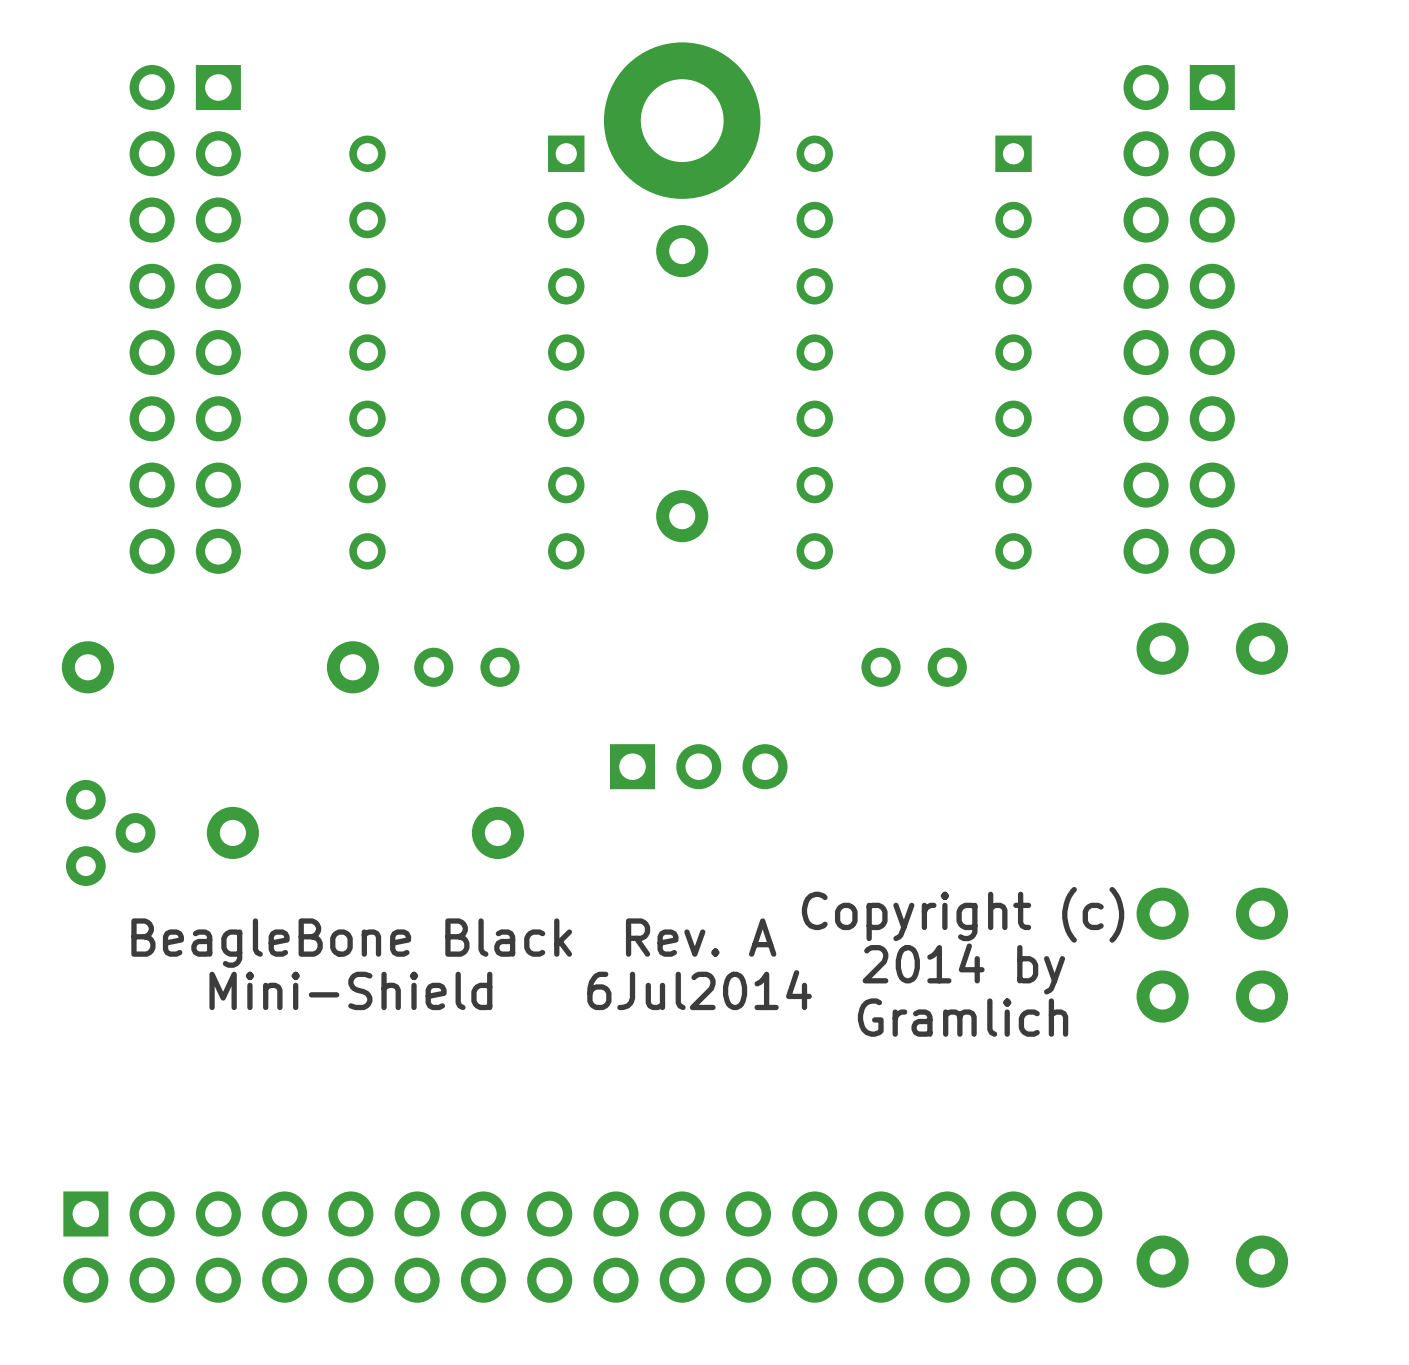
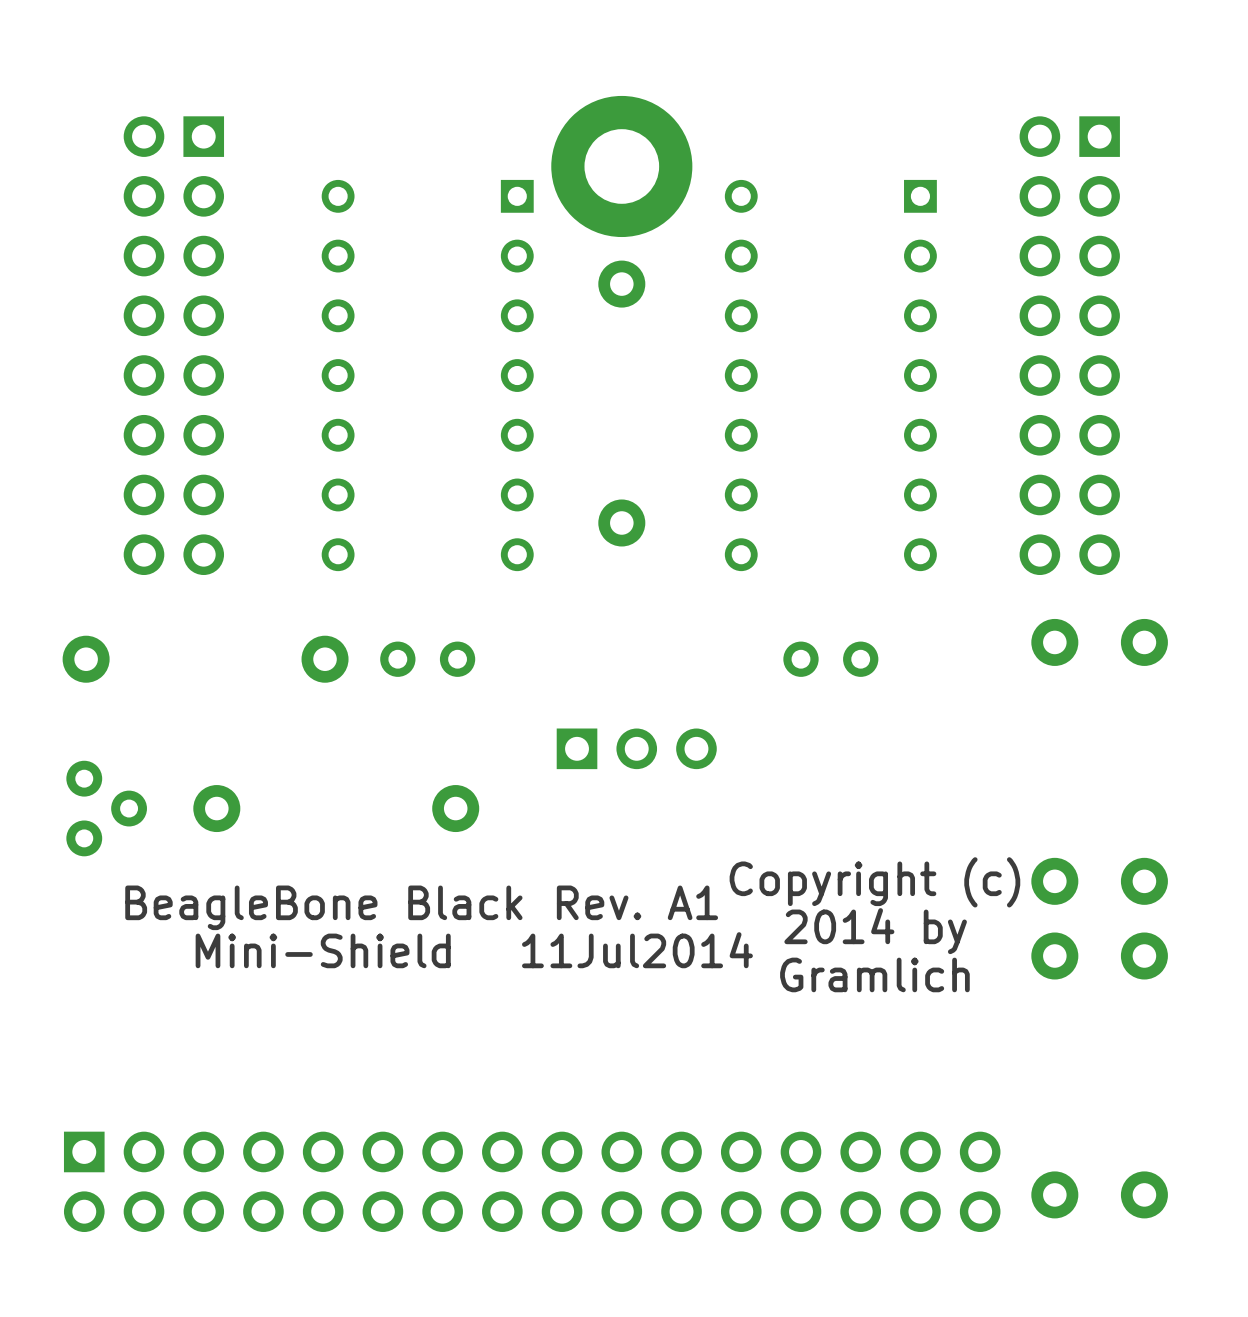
text: Rev. A (701, 937) -> Rev. A1 (637, 902)
text: 6Jul2014 (699, 990) -> 11Jul2014 (637, 950)

